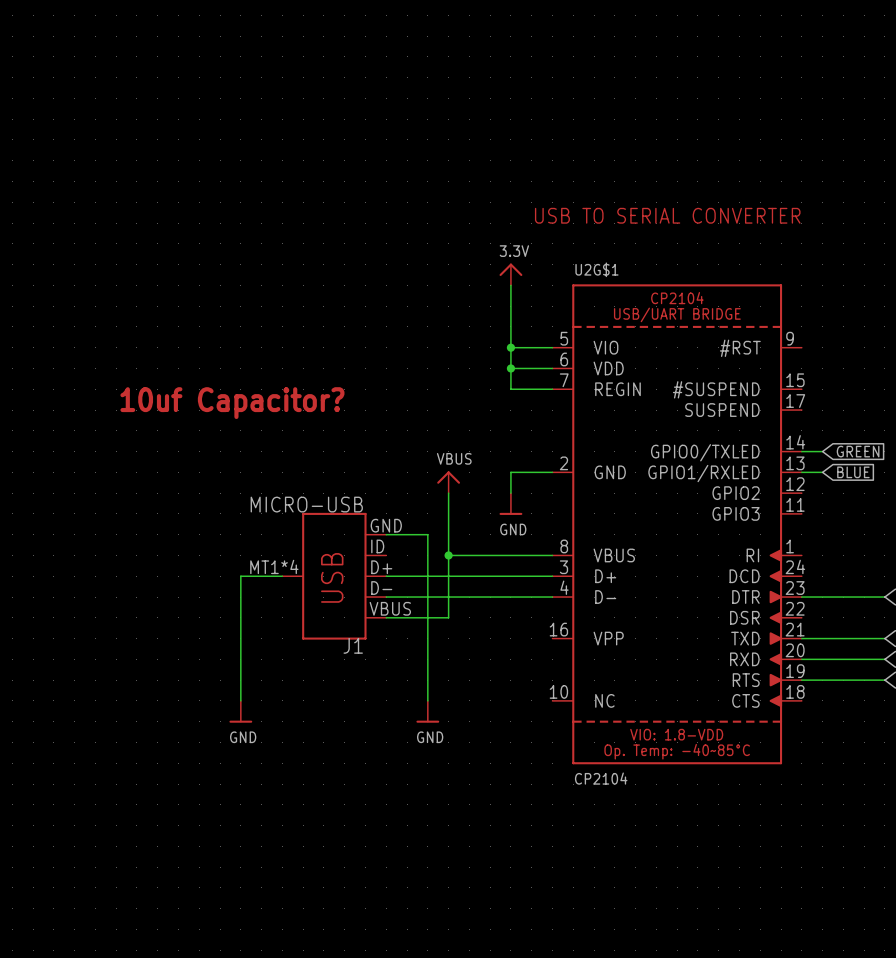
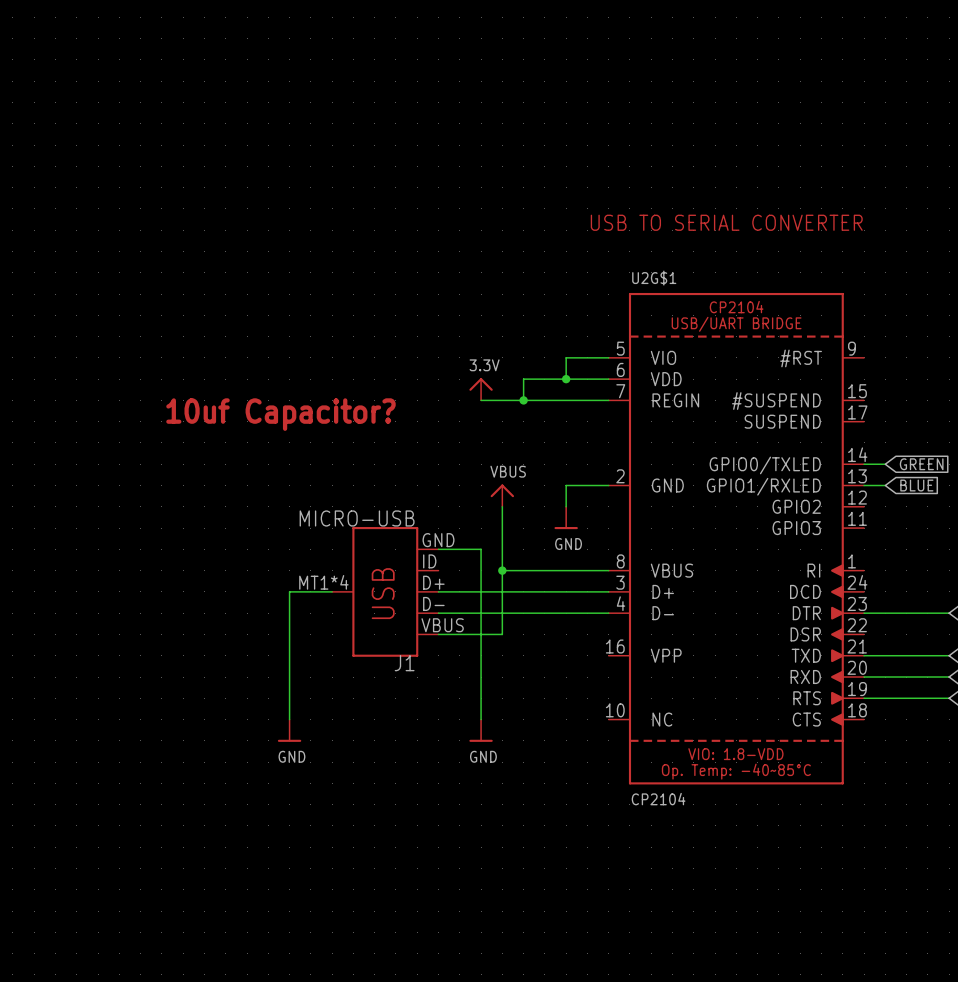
power symbol position: 3.3V (510, 274) -> 3.3V (481, 389)
wire: (510, 285) (510, 347) -> none
junction: (510, 347) -> none
wire: (510, 368) (510, 389) -> (566, 379) (523, 379) (523, 400)
wire: none -> (481, 400) (566, 400)
junction: none -> (523, 400)

